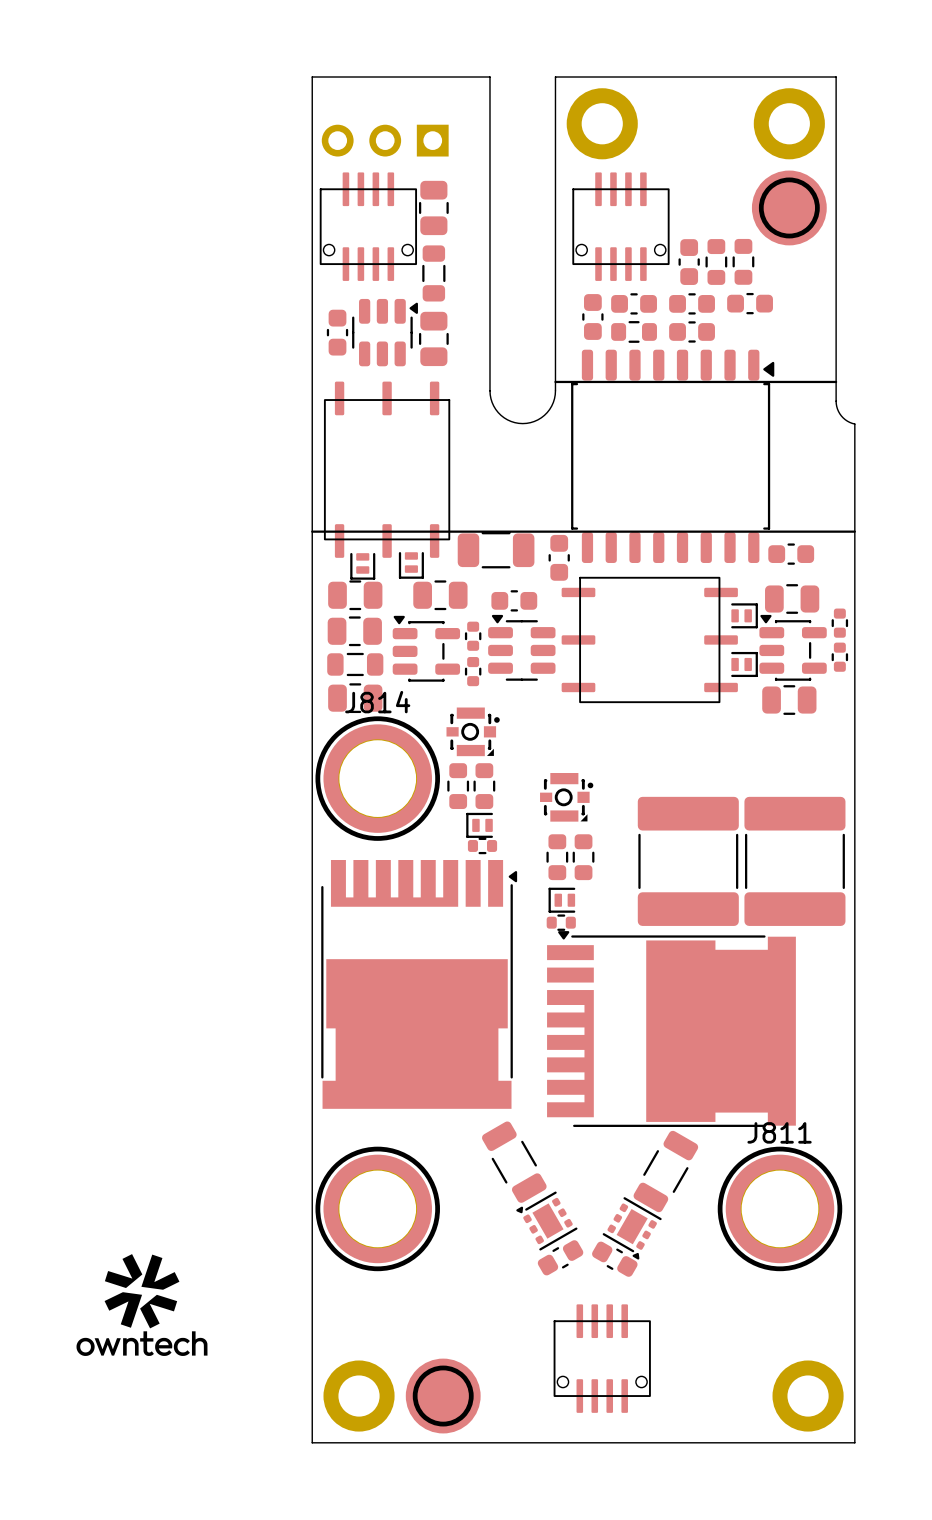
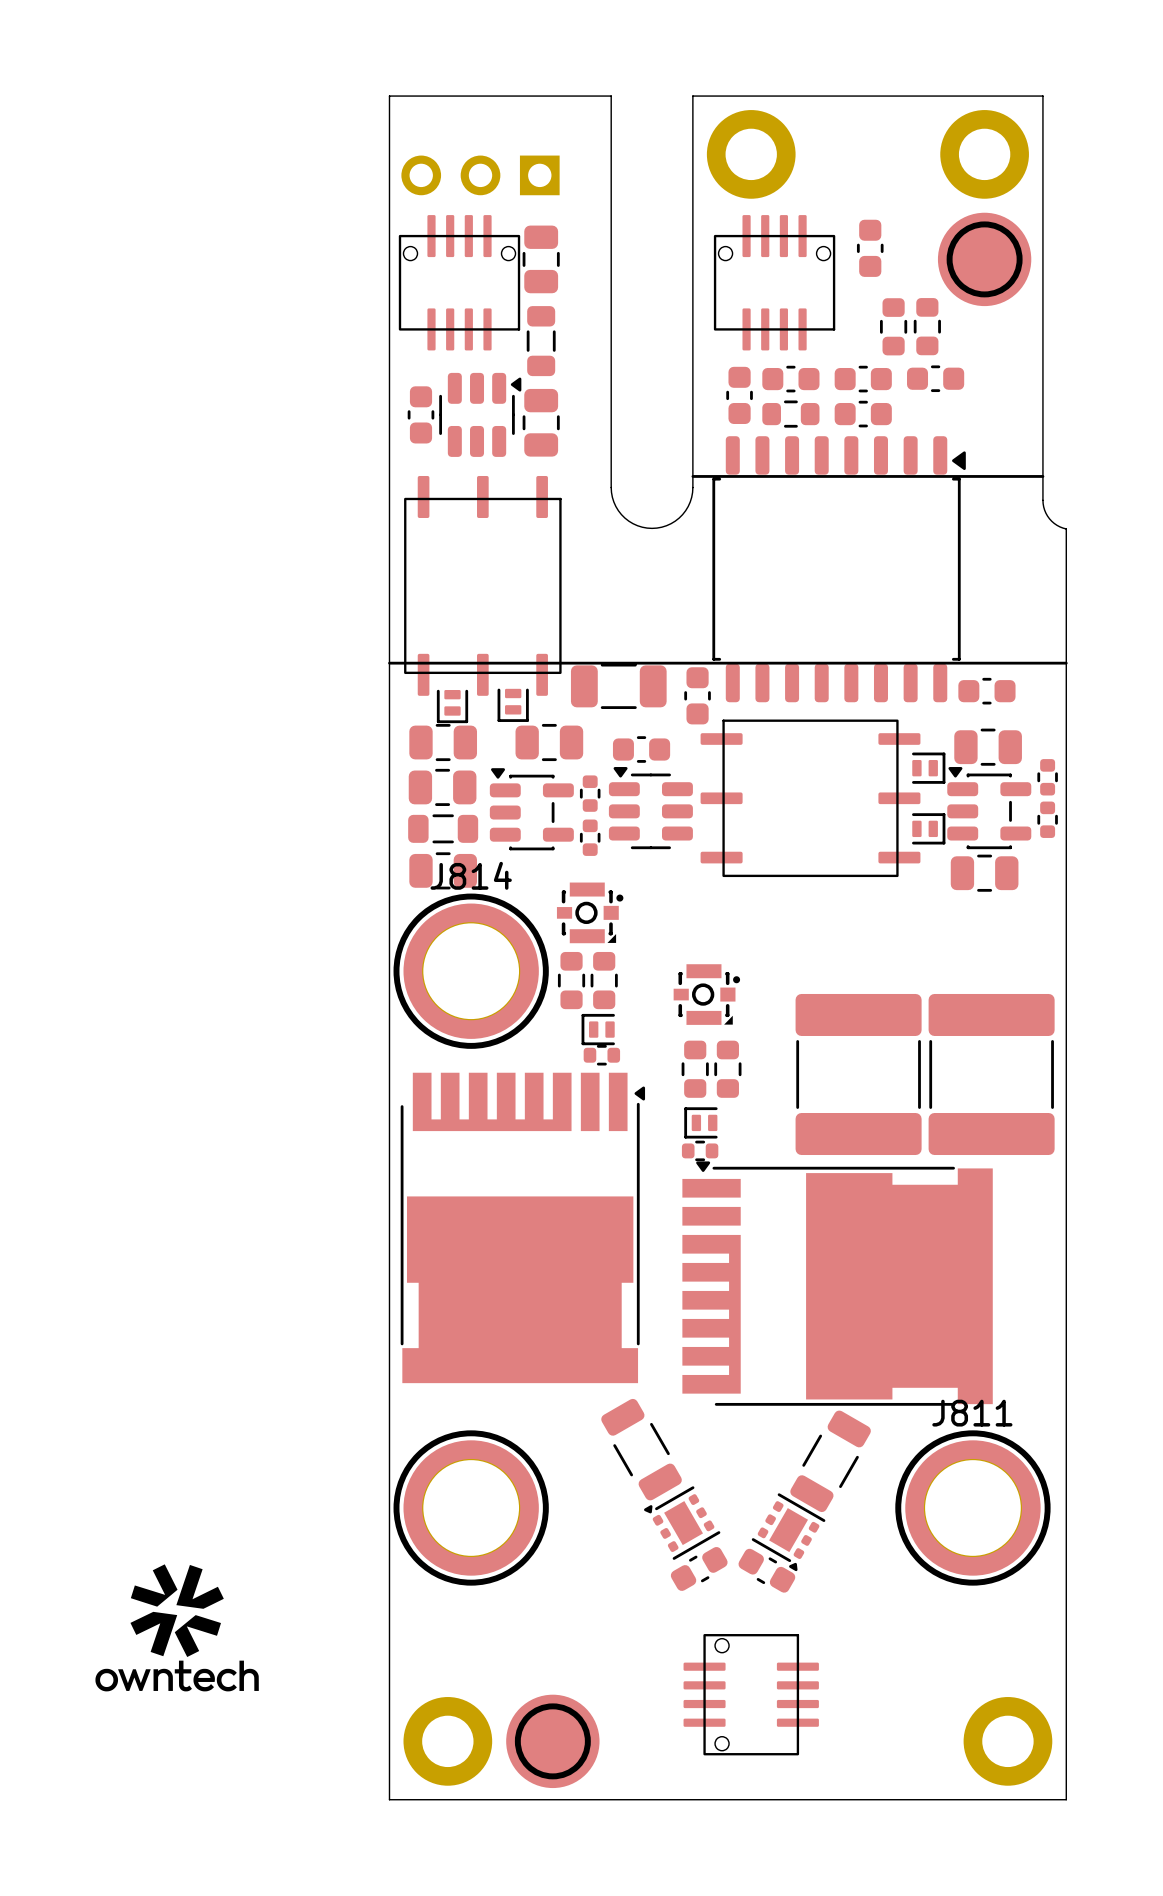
part rotation: 0° (368, 226) -> 180° (459, 282)
part rotation: 0° (620, 226) -> 180° (774, 282)
part position: (689, 262) -> (870, 248)
part rotation: 0° (602, 1358) -> 90° clockwise (751, 1694)

